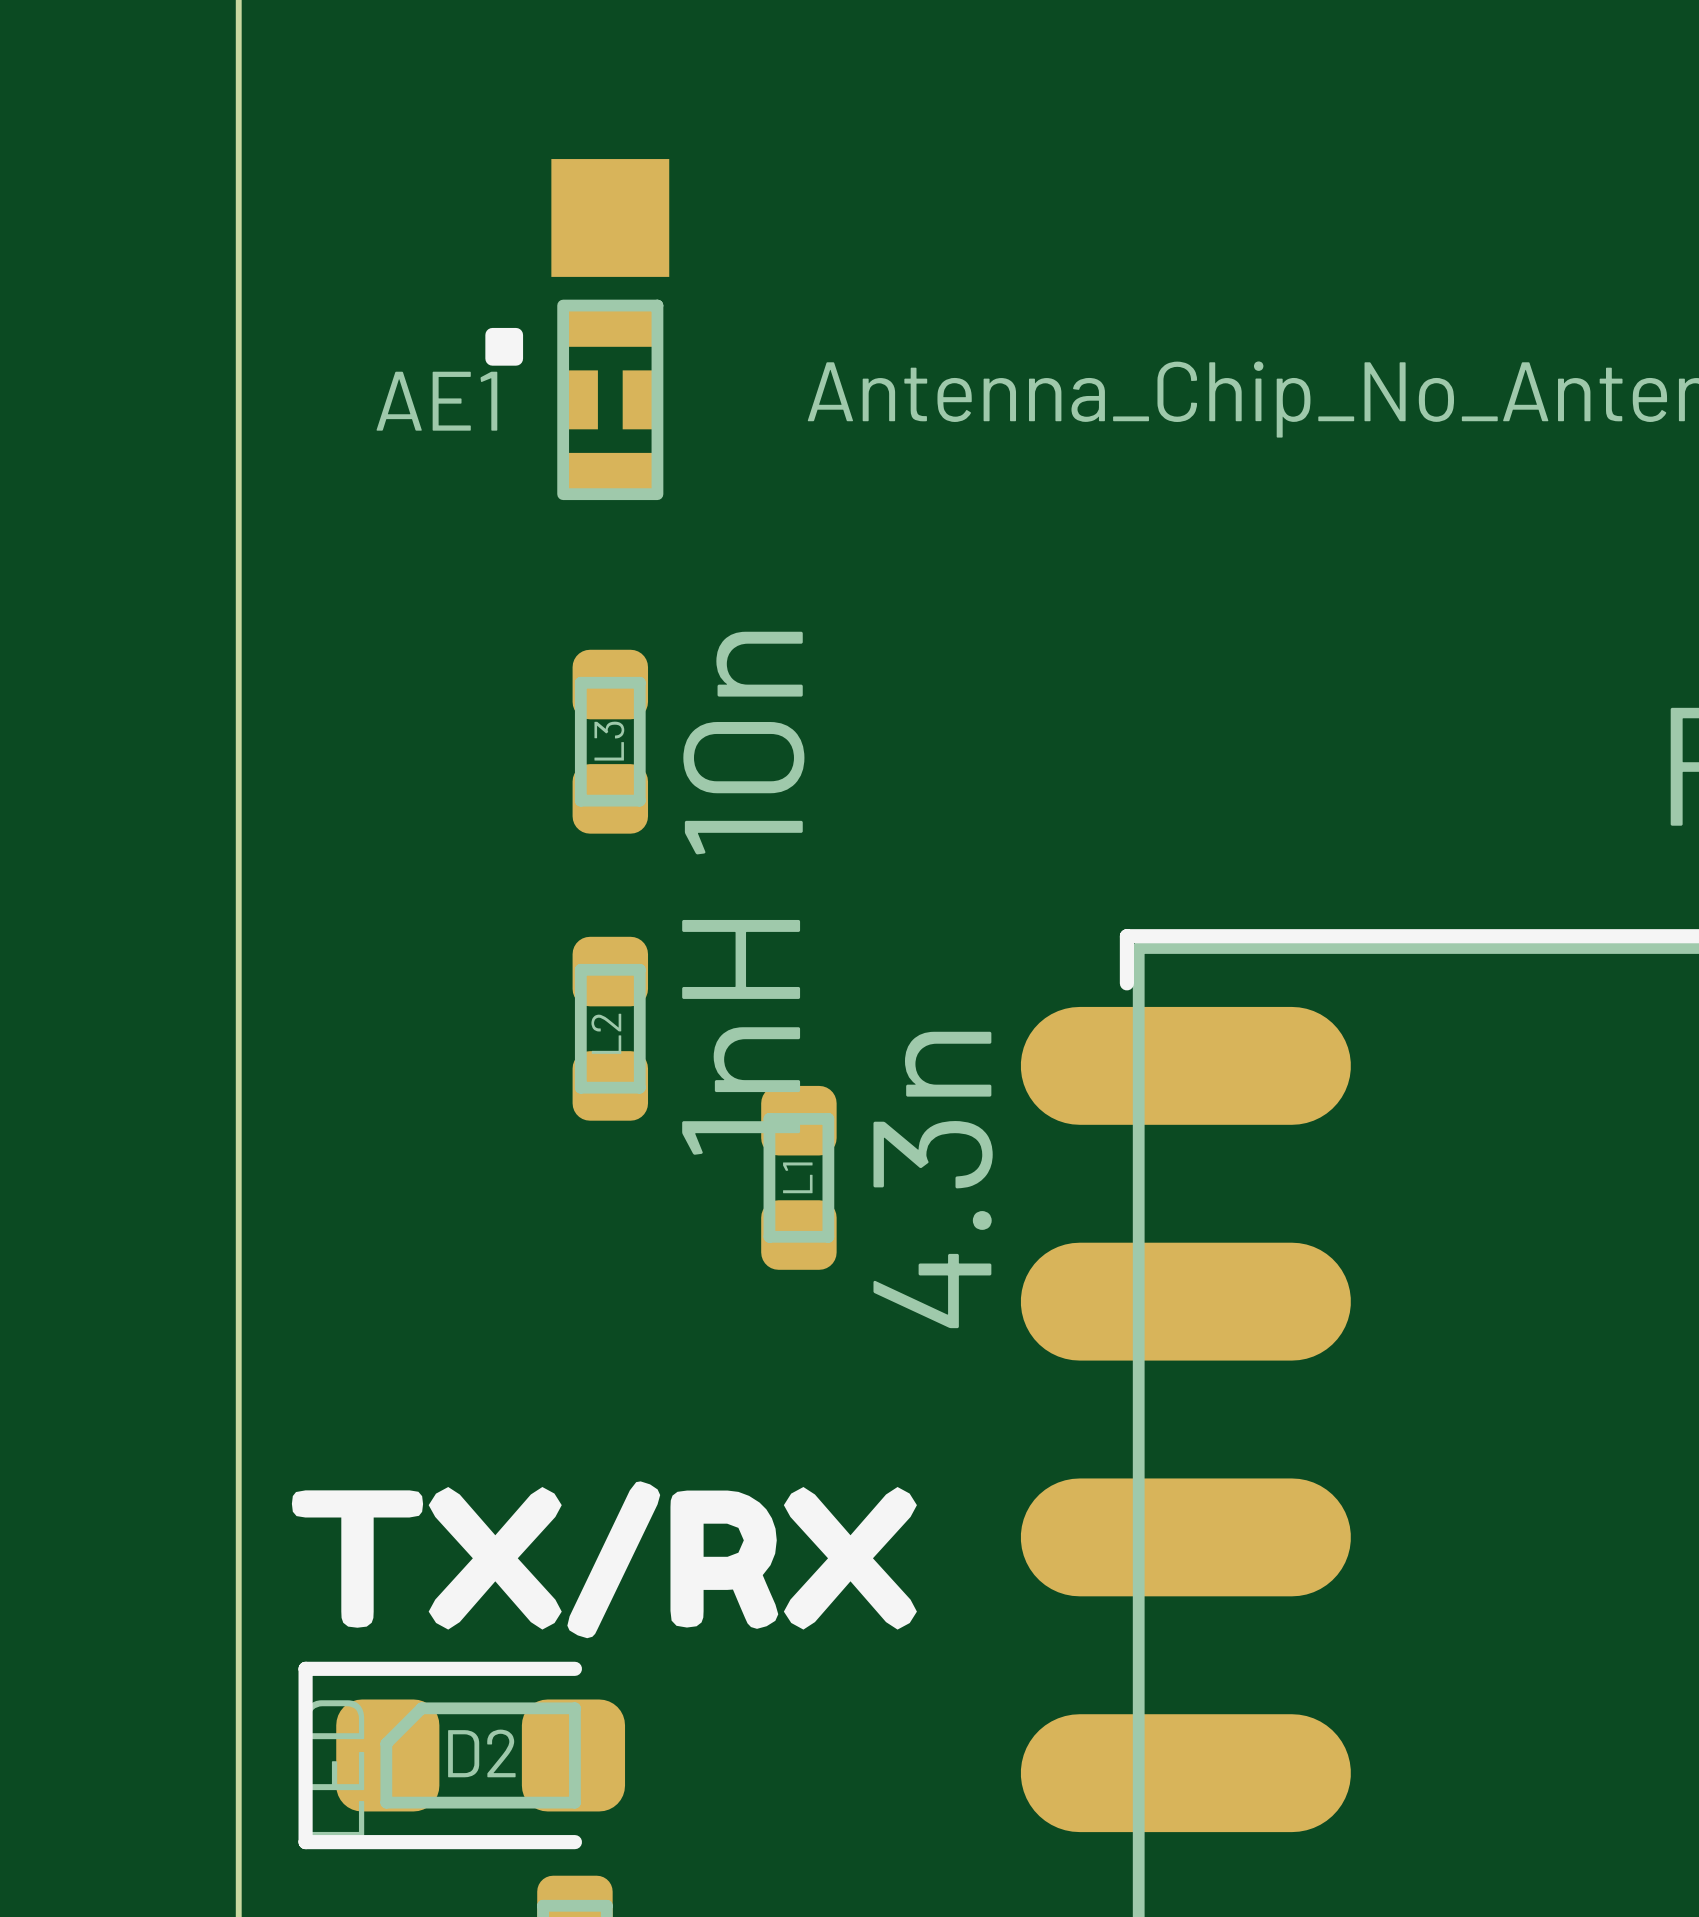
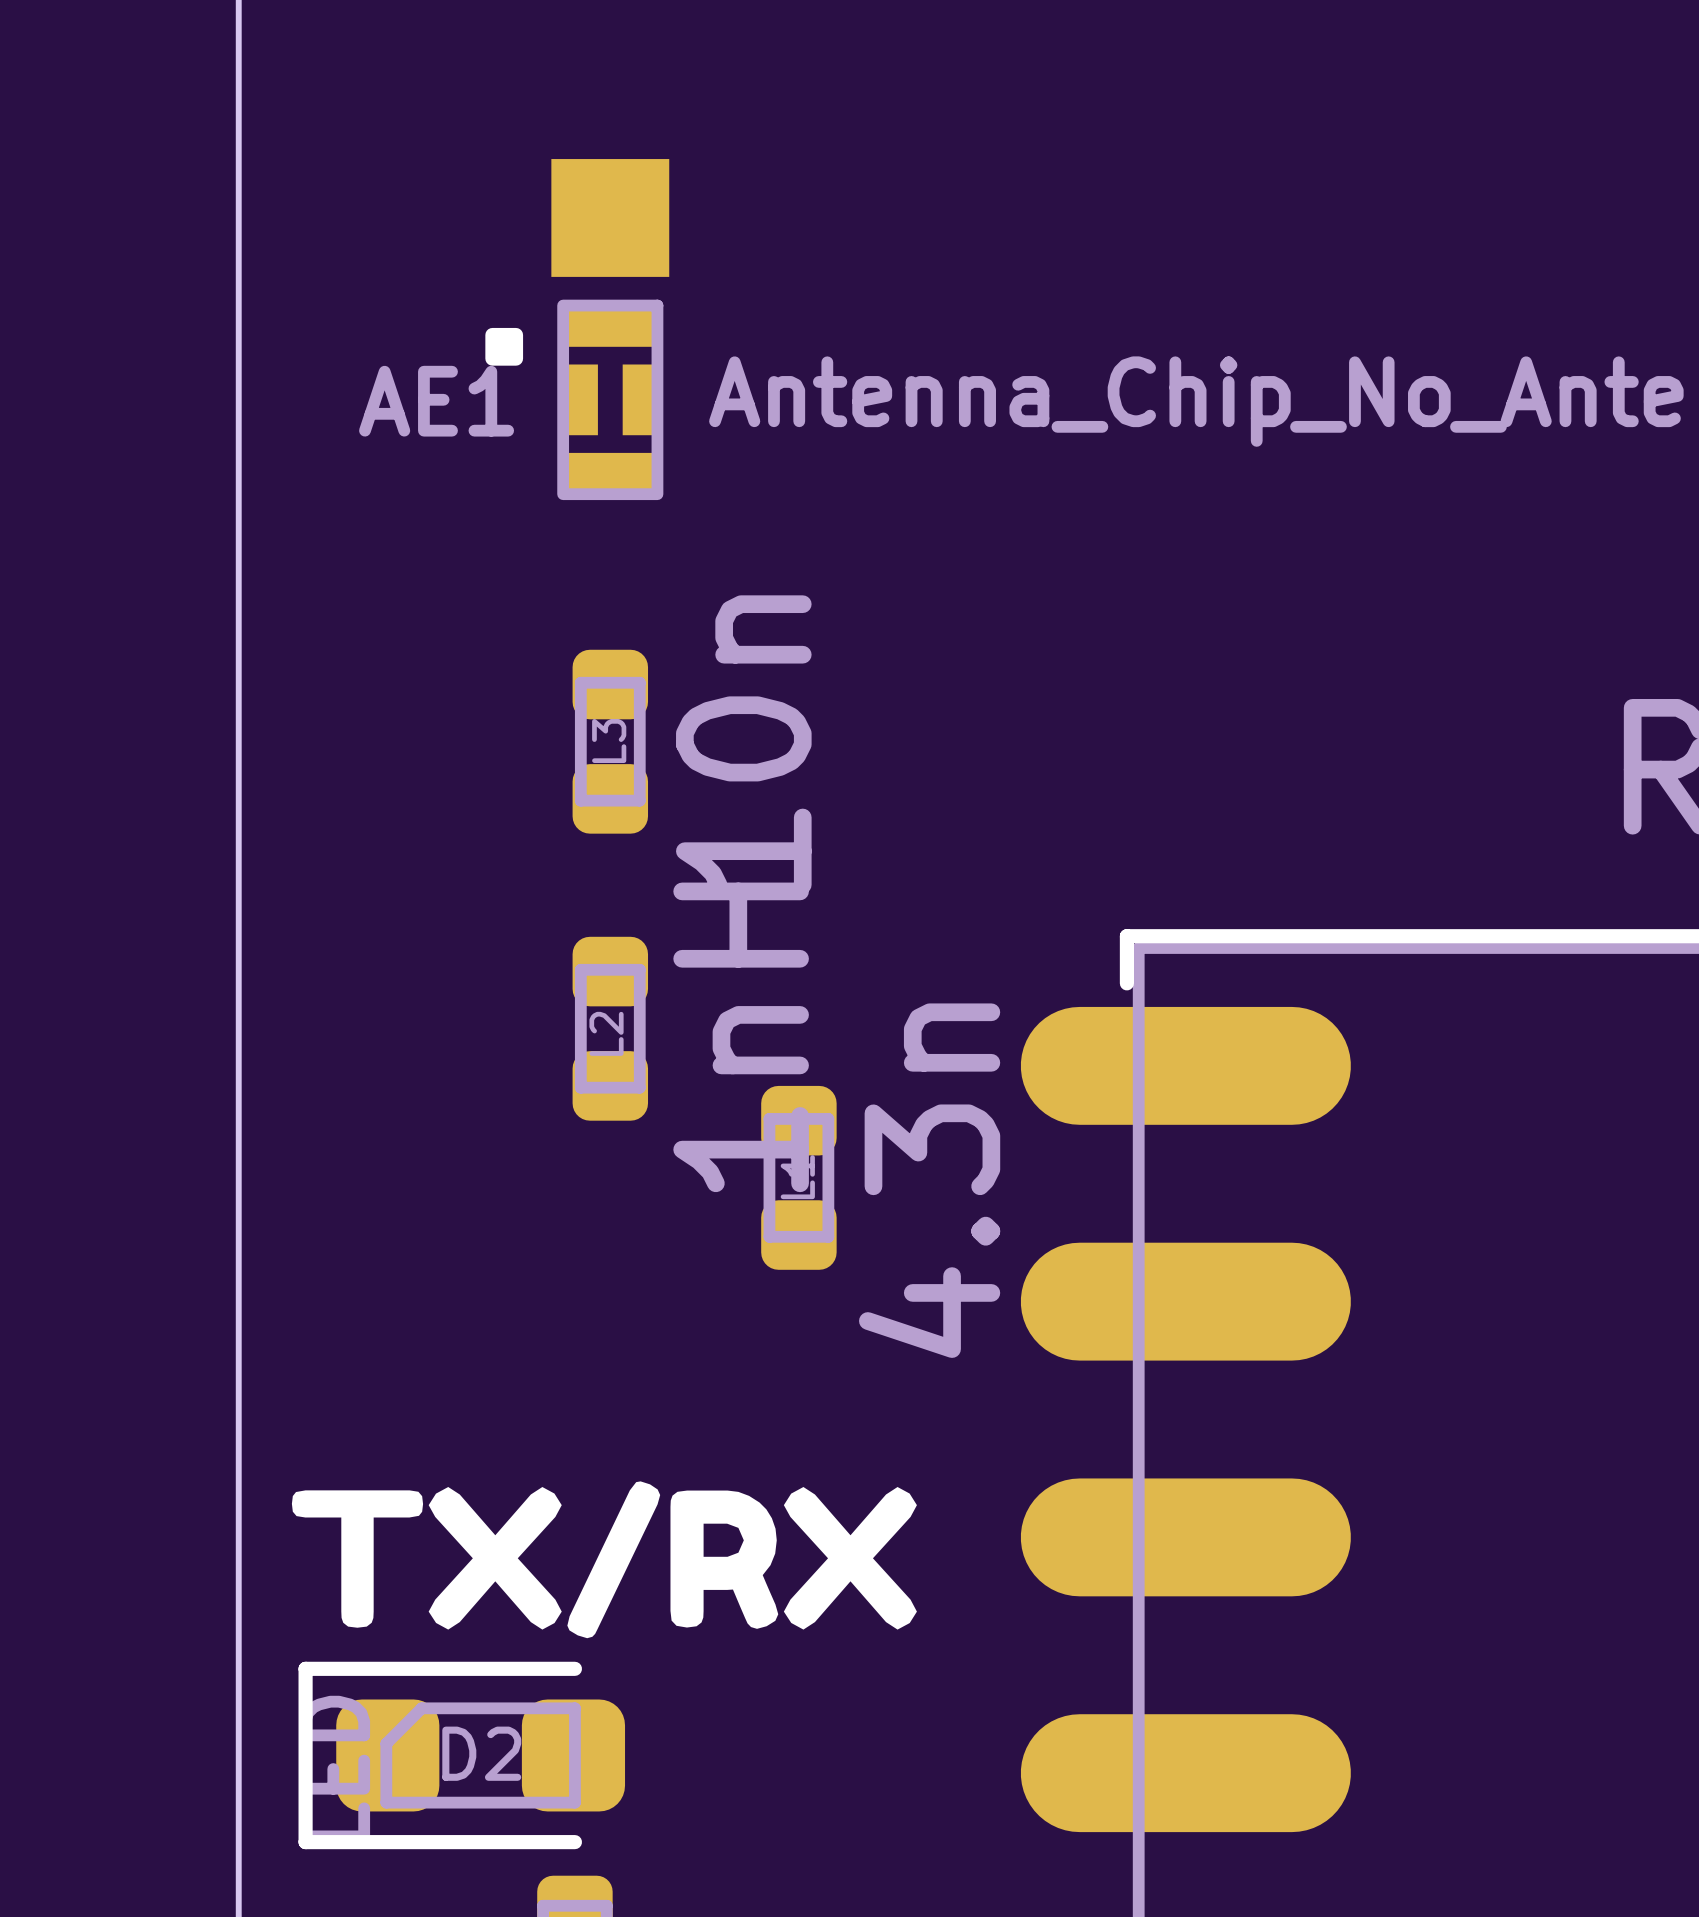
AE1 footprint: [485, 299, 664, 501] -> [485, 299, 664, 501]

